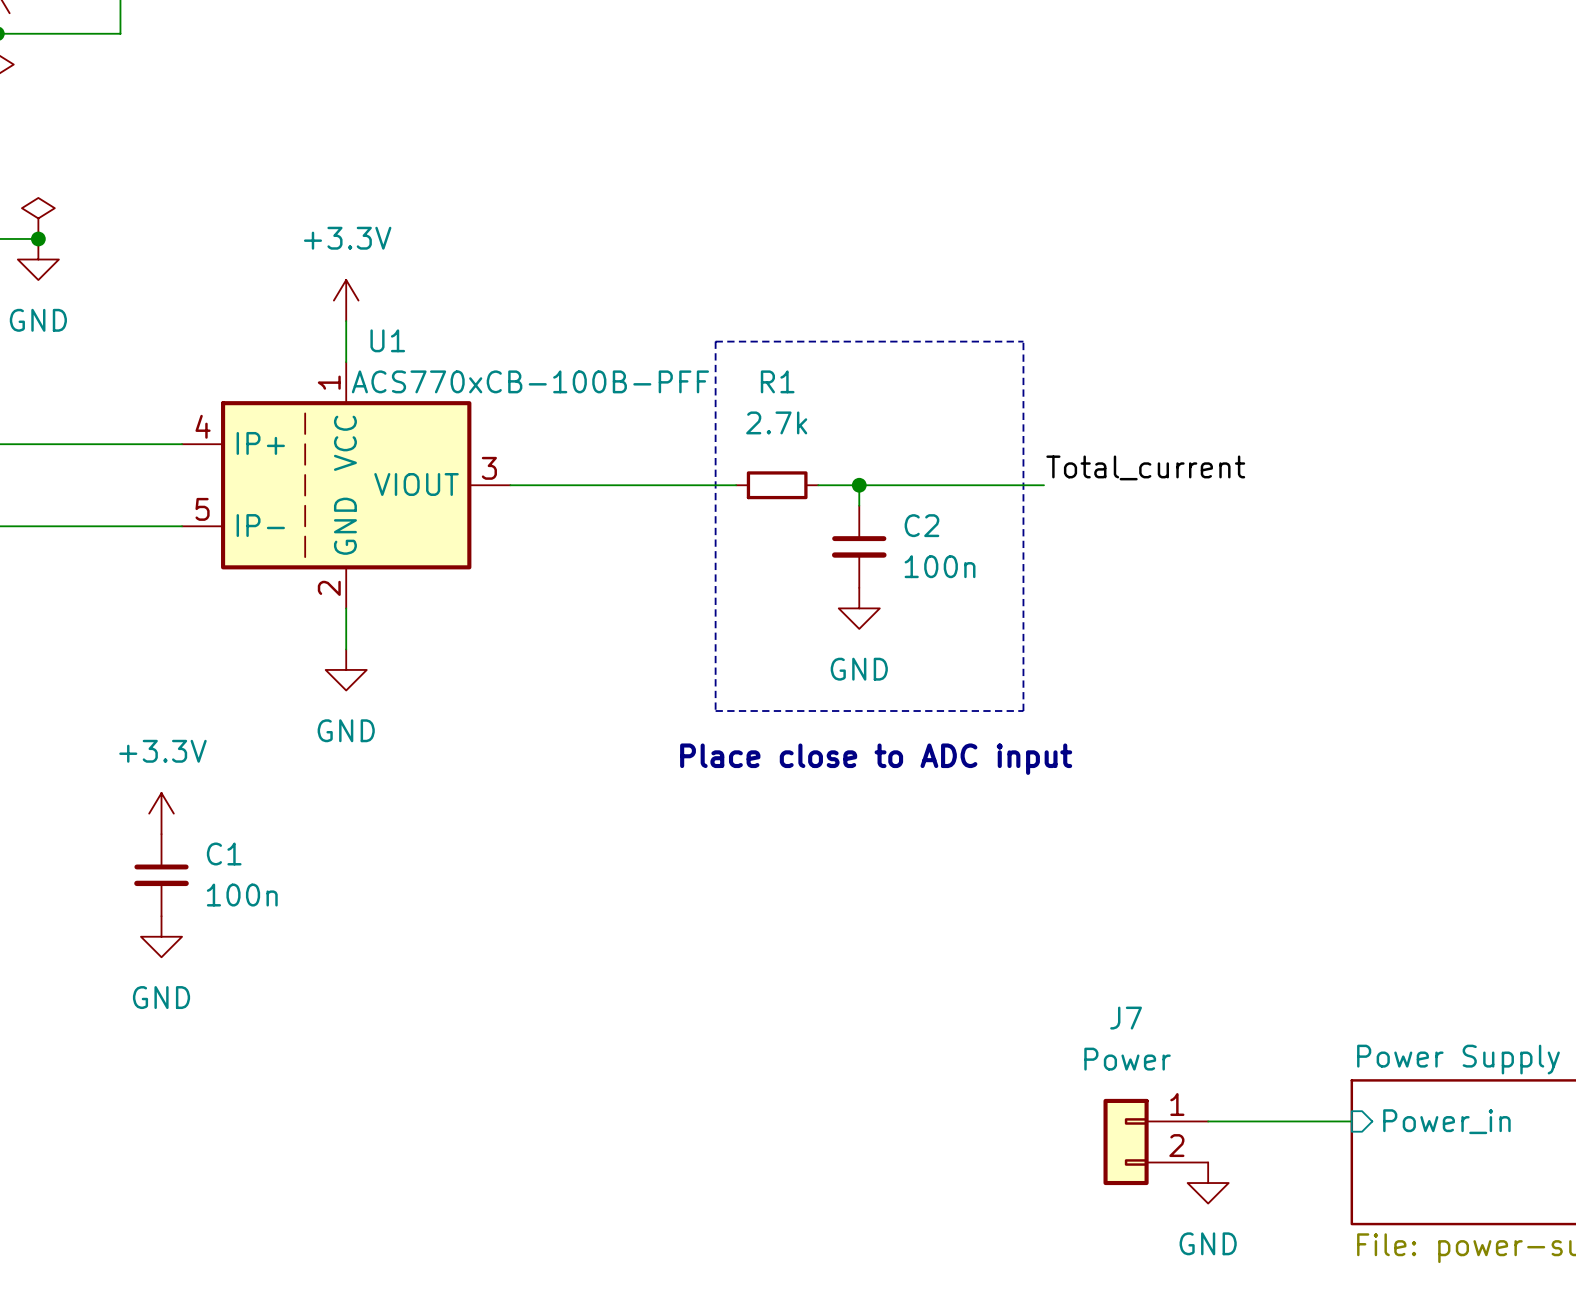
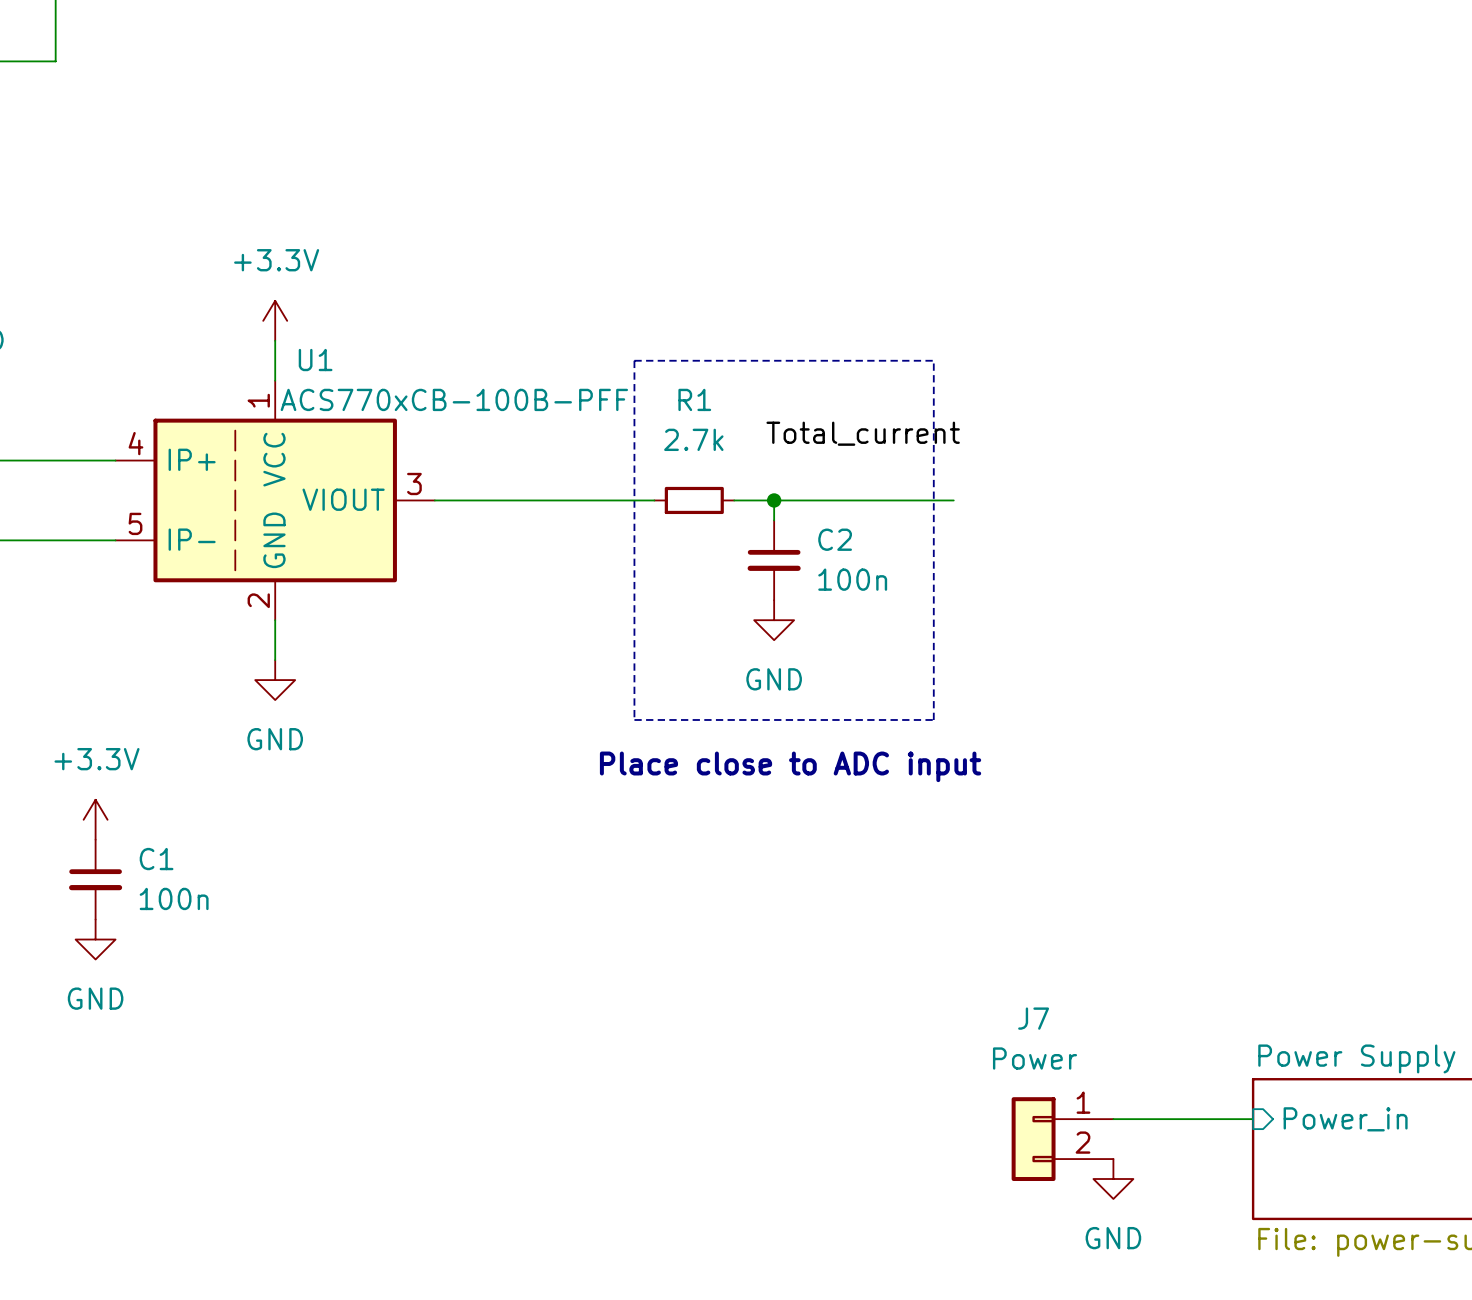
label position: Total_current (1145, 467) -> Total_current (863, 433)

